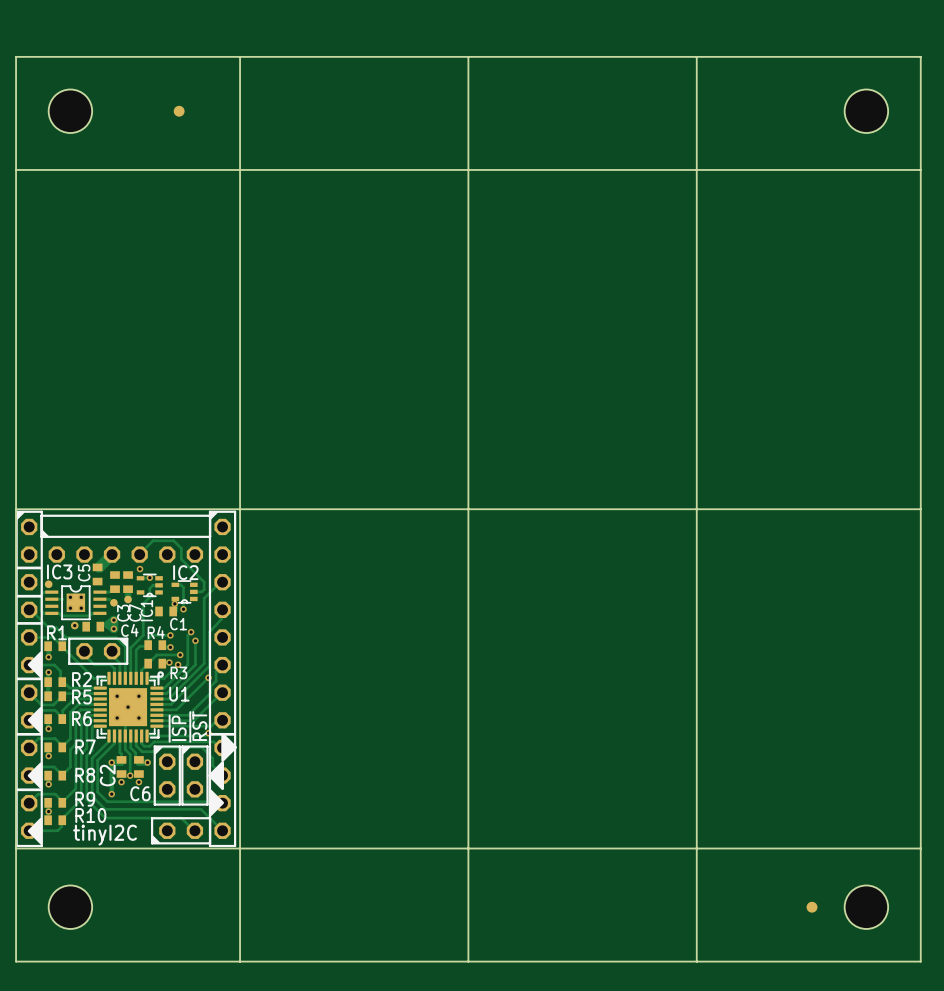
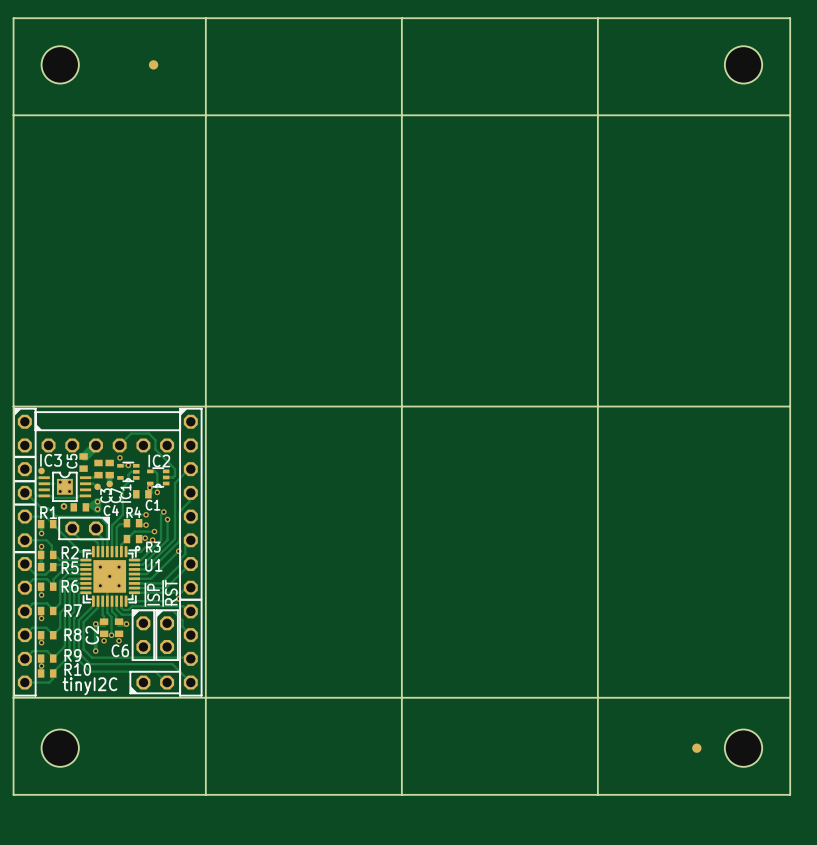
drawing: [27, 651, 43, 679] -> none
drawing: [27, 706, 43, 734] -> none
drawing: [208, 732, 238, 817] -> none
line: (17, 734) (41, 734) -> none
drawing: [27, 762, 43, 789] -> none
line: (17, 789) (41, 789) -> none
drawing: [27, 817, 43, 845] -> none

